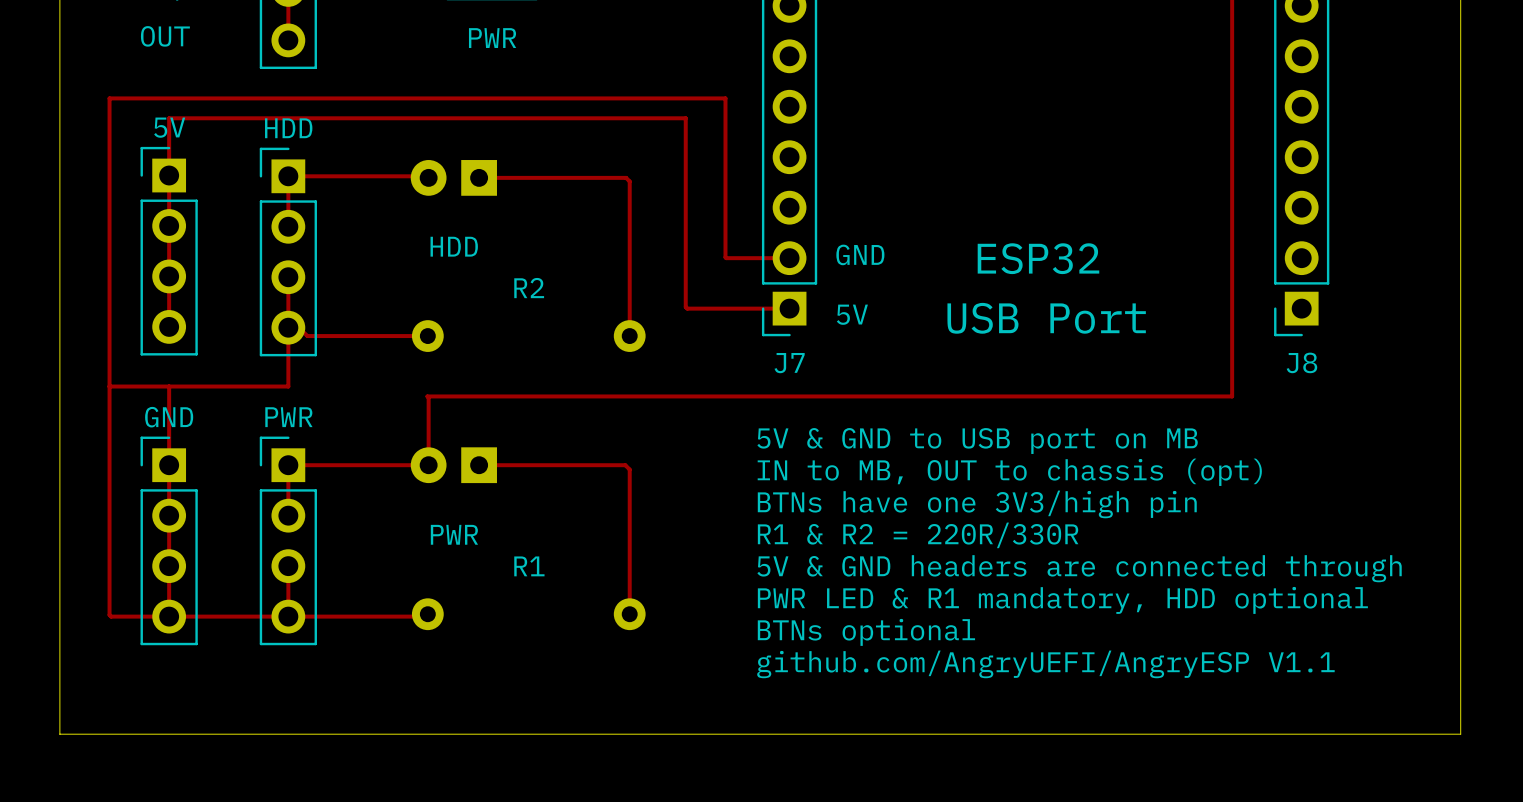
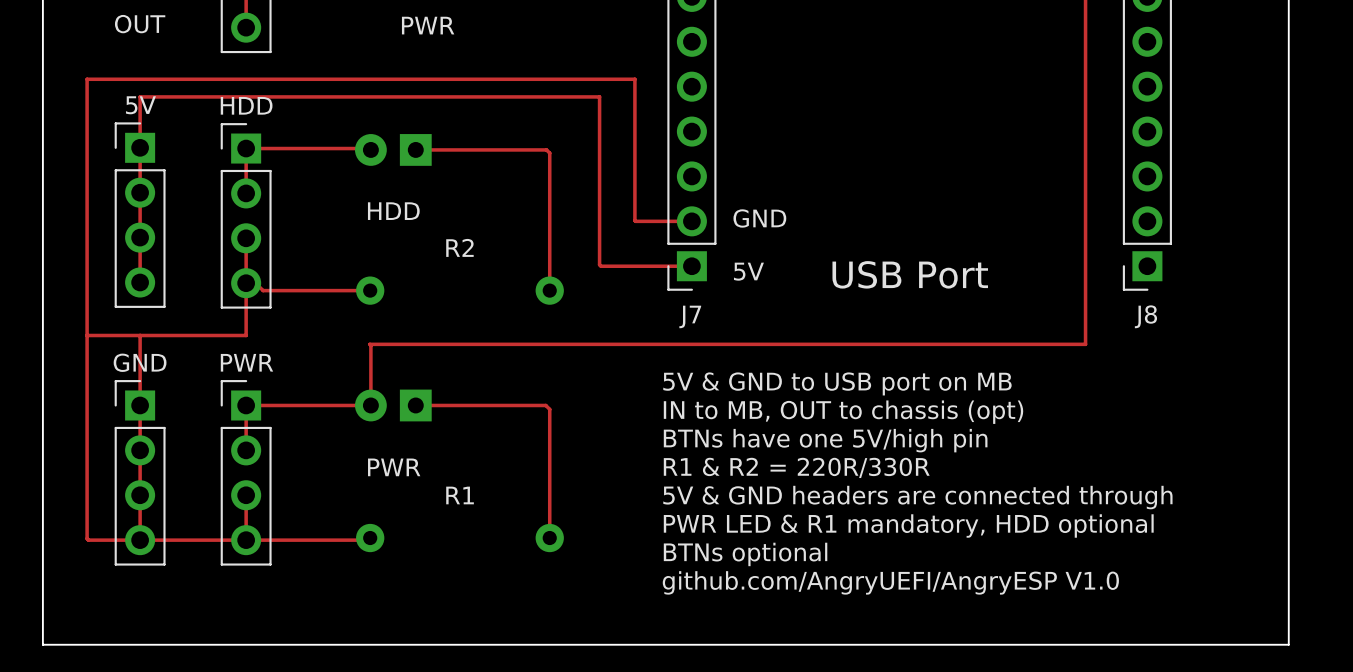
text: ESP32 (1038, 258) -> none
text: BTNs have one 3V3/high pin (977, 504) -> BTNs have one 5V/high pin (825, 440)
text: github.com/AngryUEFI/AngryESP V1.1 (1045, 664) -> github.com/AngryUEFI/AngryESP V1.0 (890, 582)

